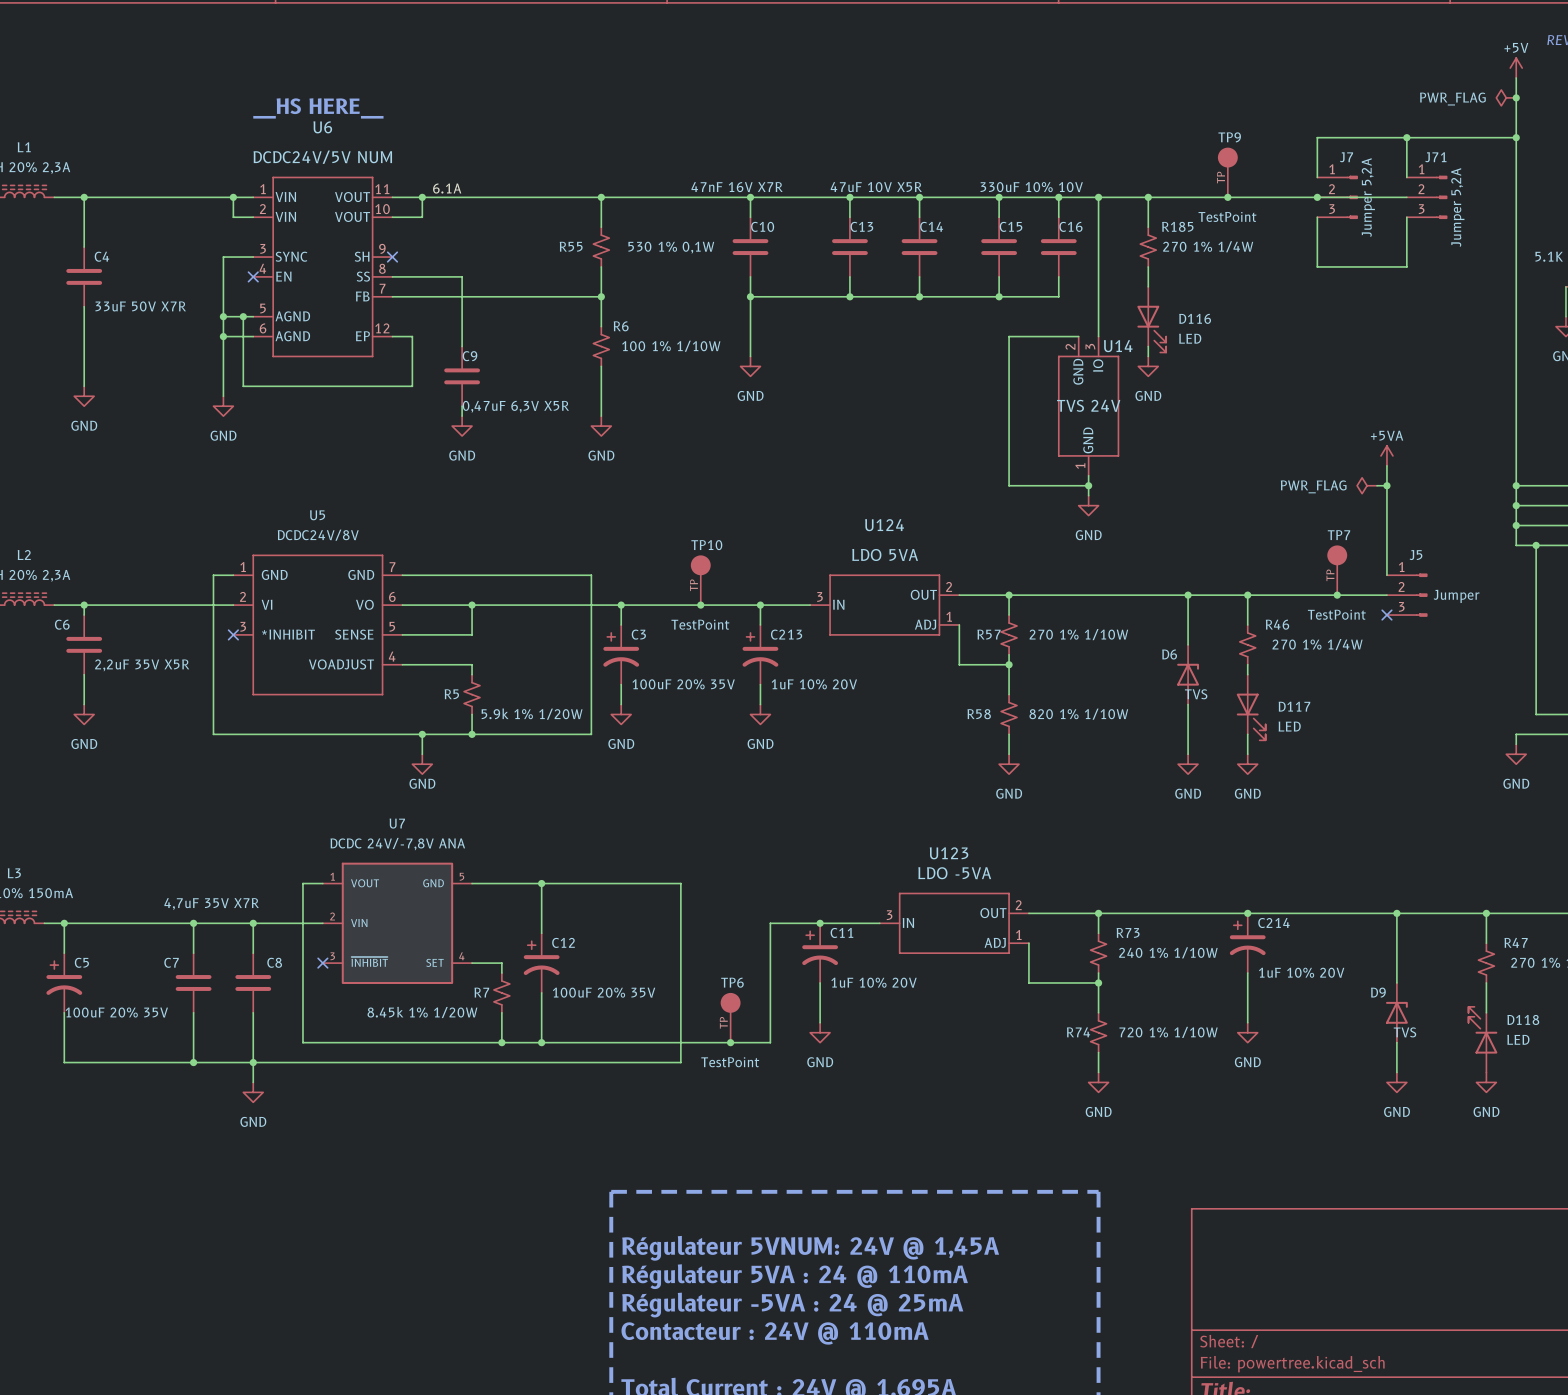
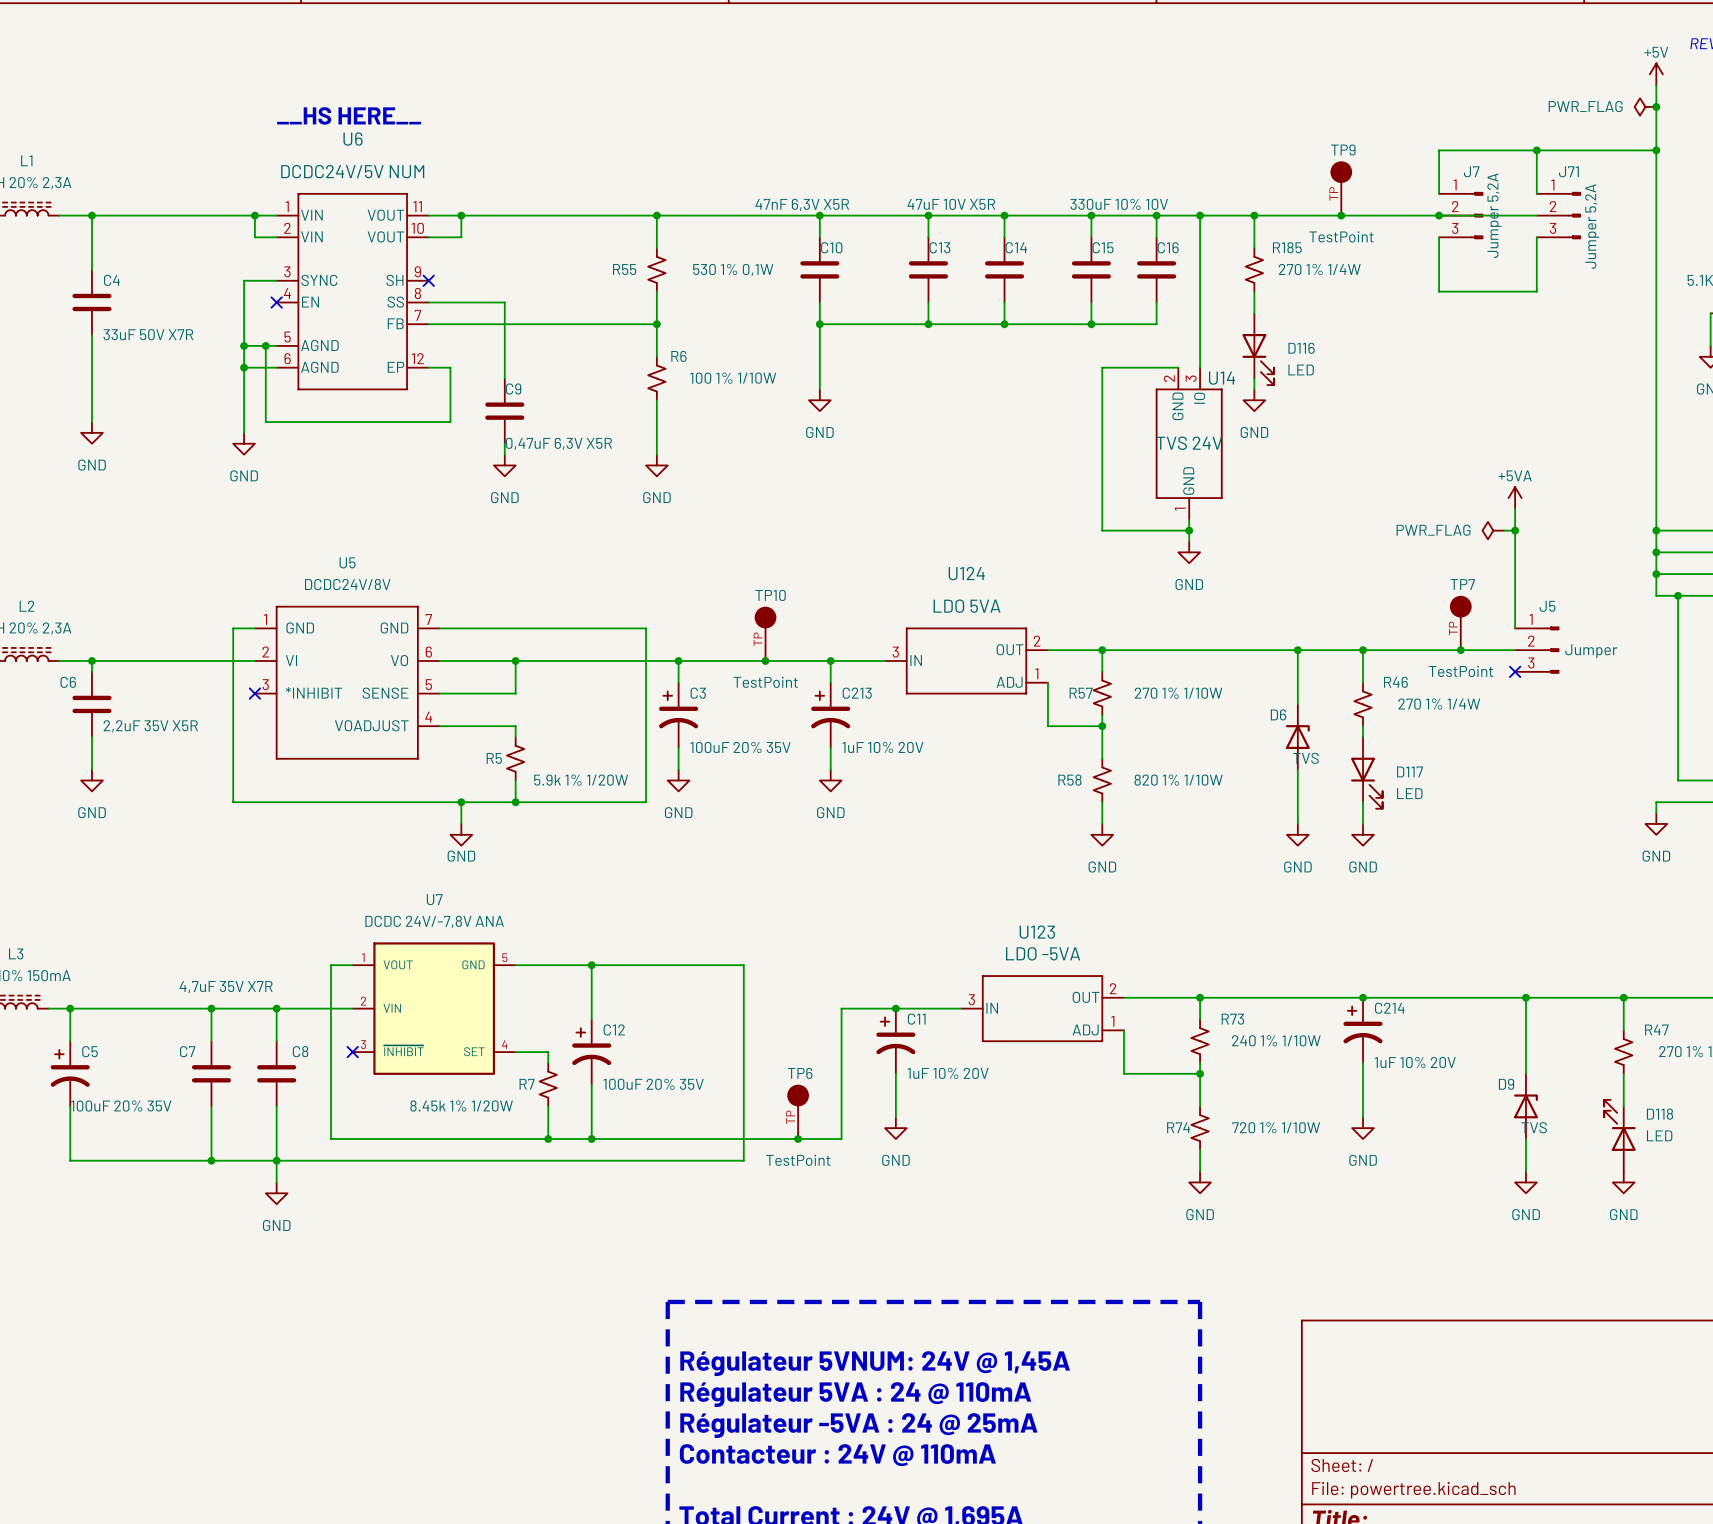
C10 value: 47nF 16V X7R (737, 187) -> 47nF 6,3V X5R (802, 204)
label: 6.1A (447, 188) -> none

